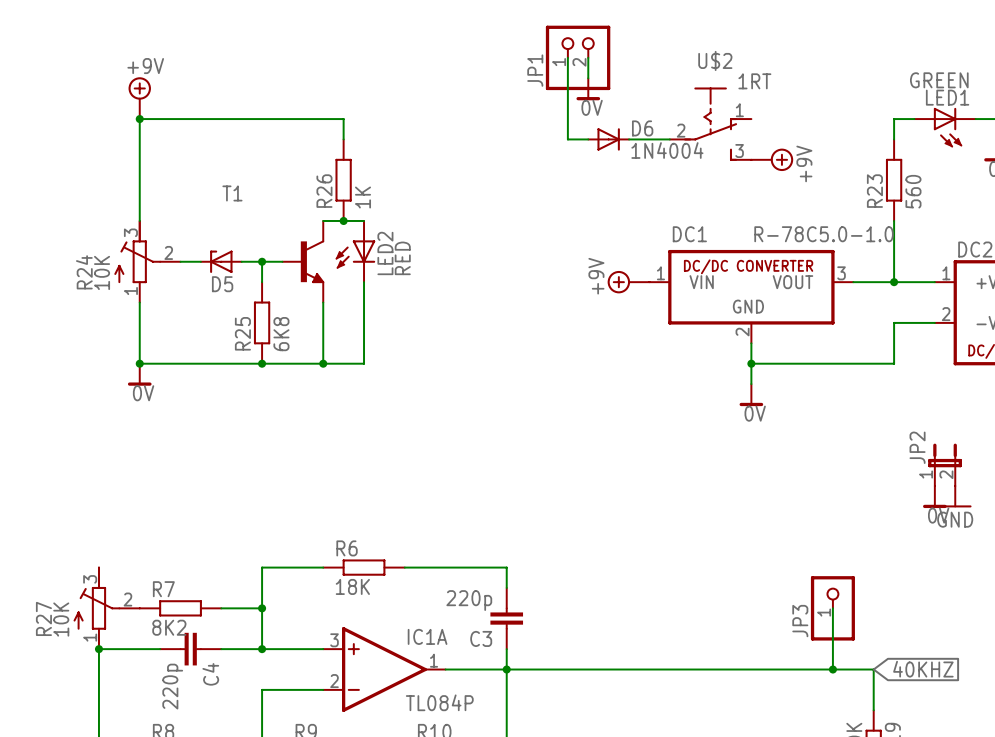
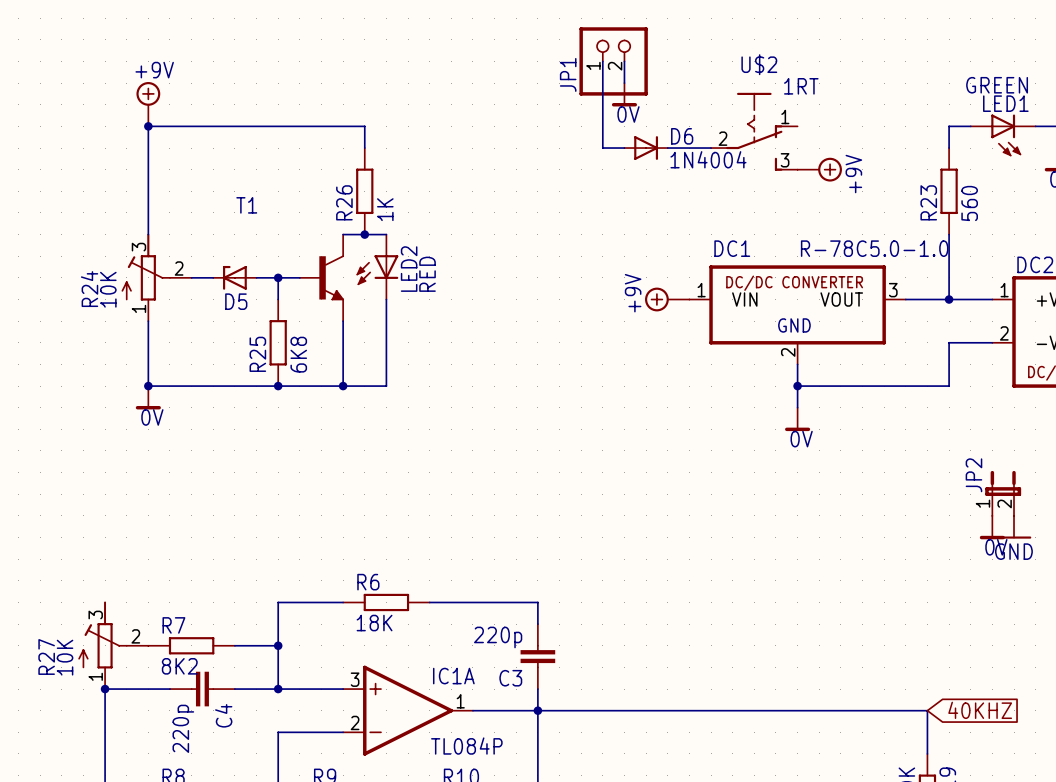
wire: (832, 608) (832, 669) -> none
JP3: (832, 608) -> none
junction: (832, 669) -> none

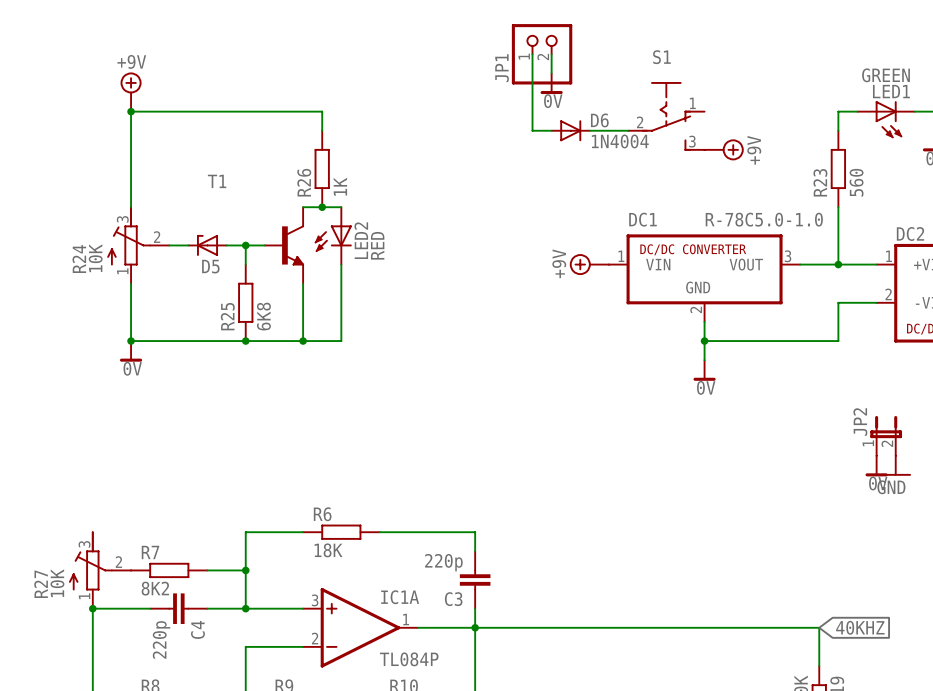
U$2 name: U$2 (759, 64) -> S1 (661, 57)
U$2 value: 1RT (801, 86) -> none

